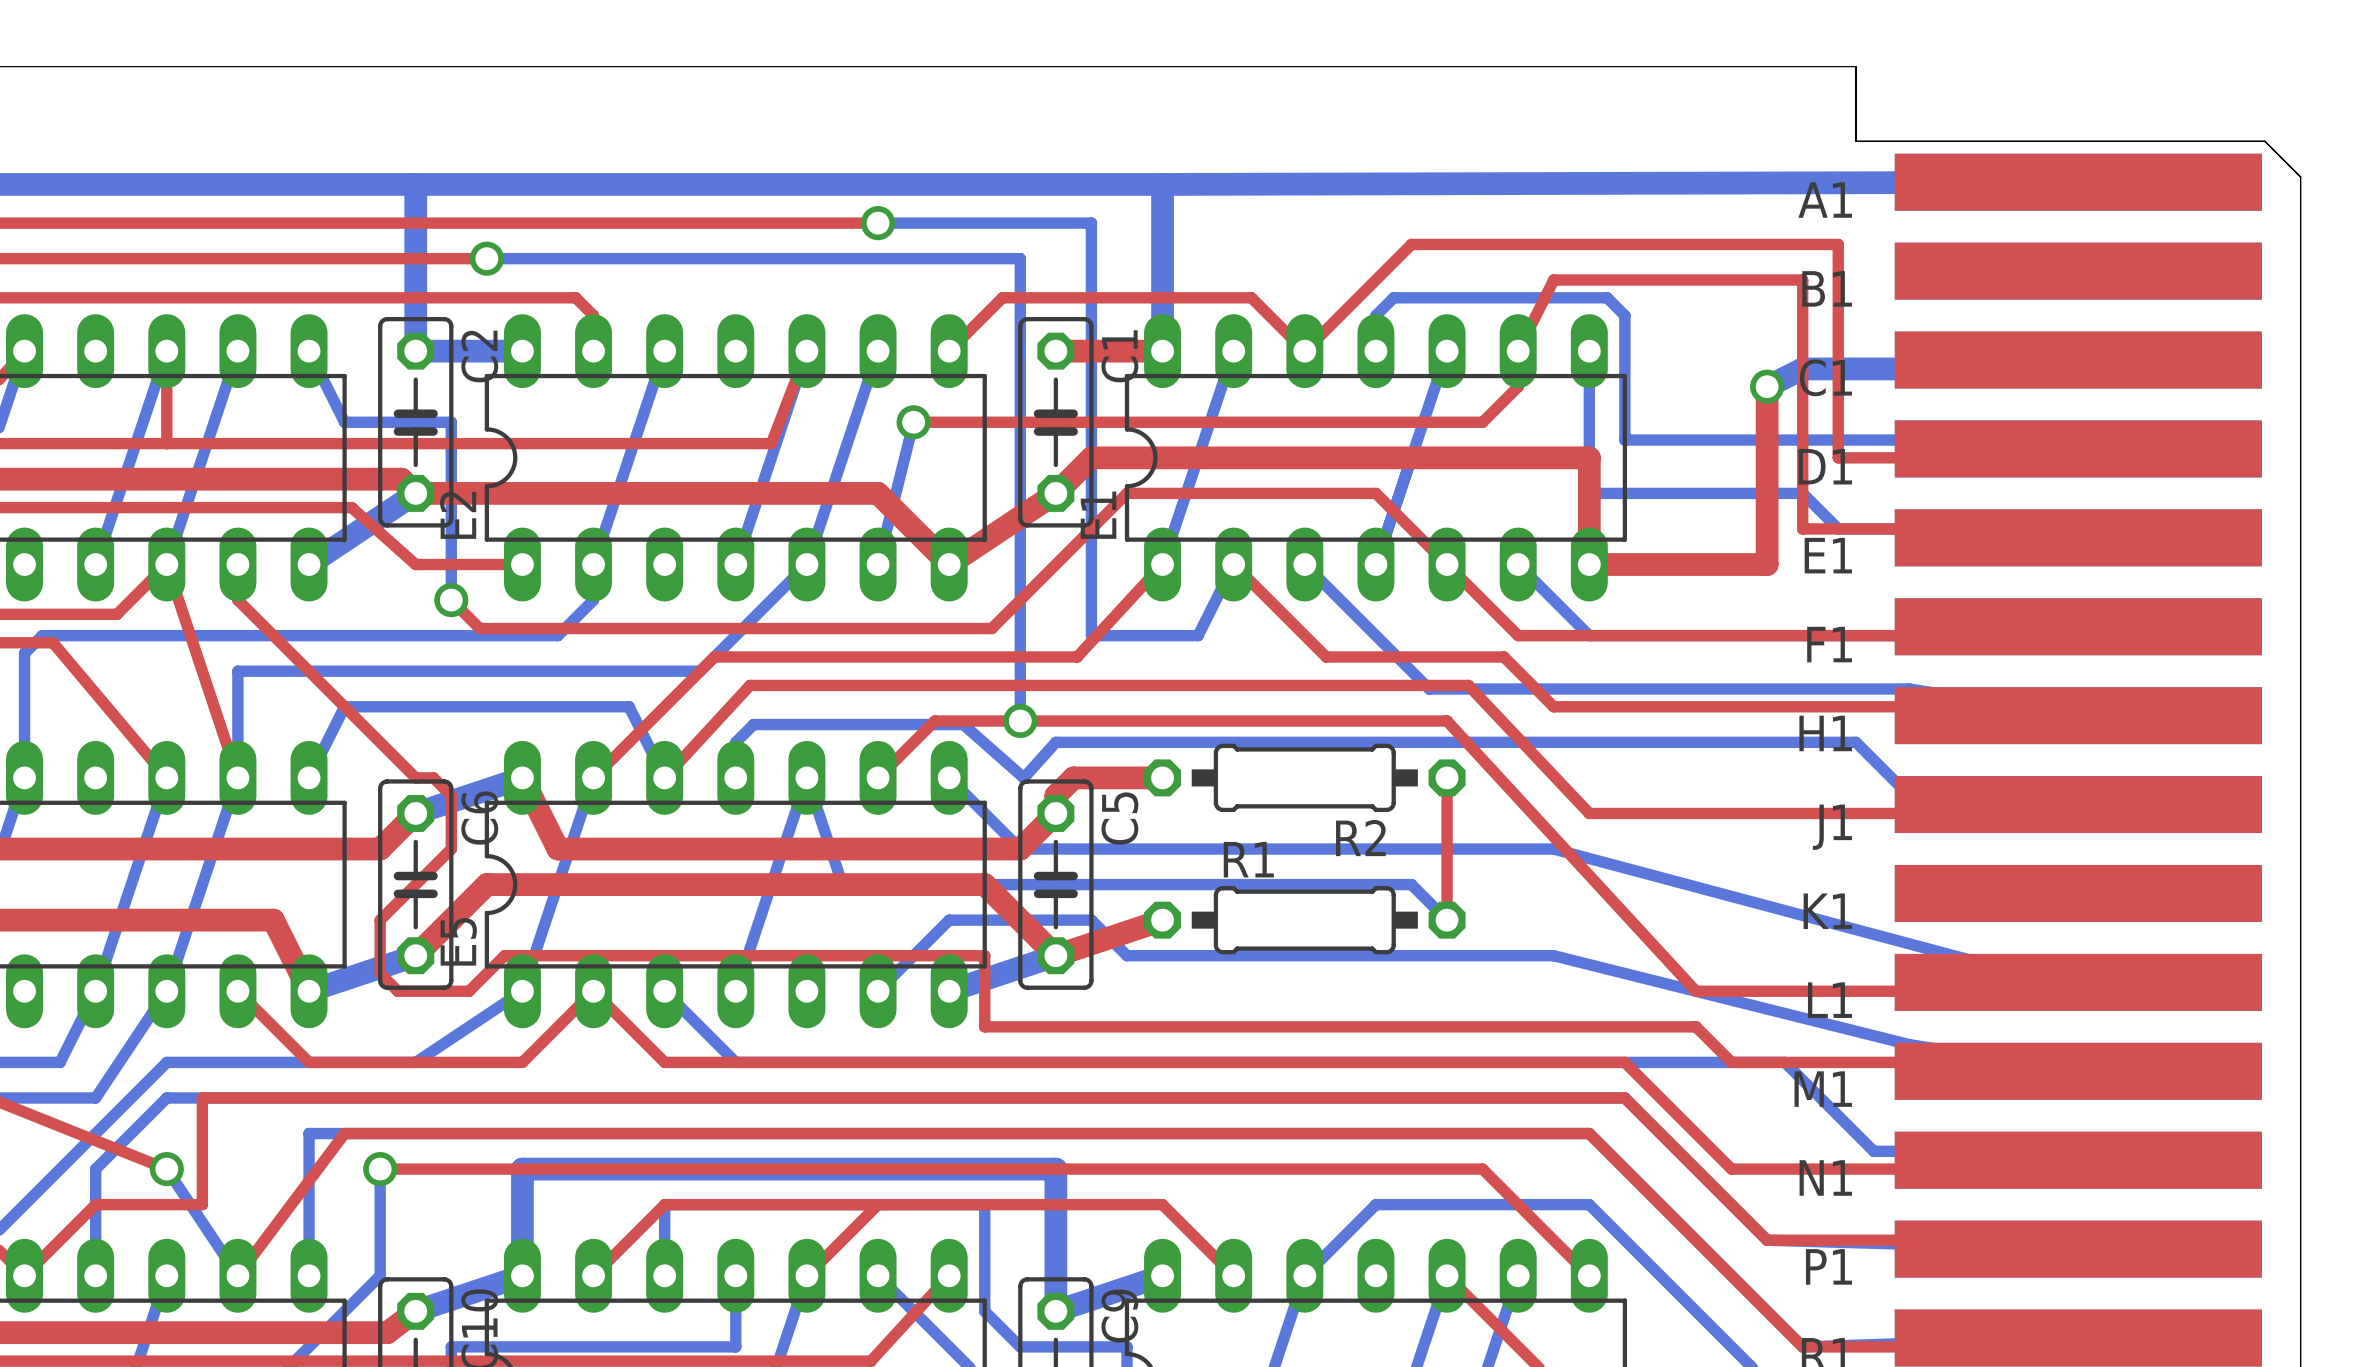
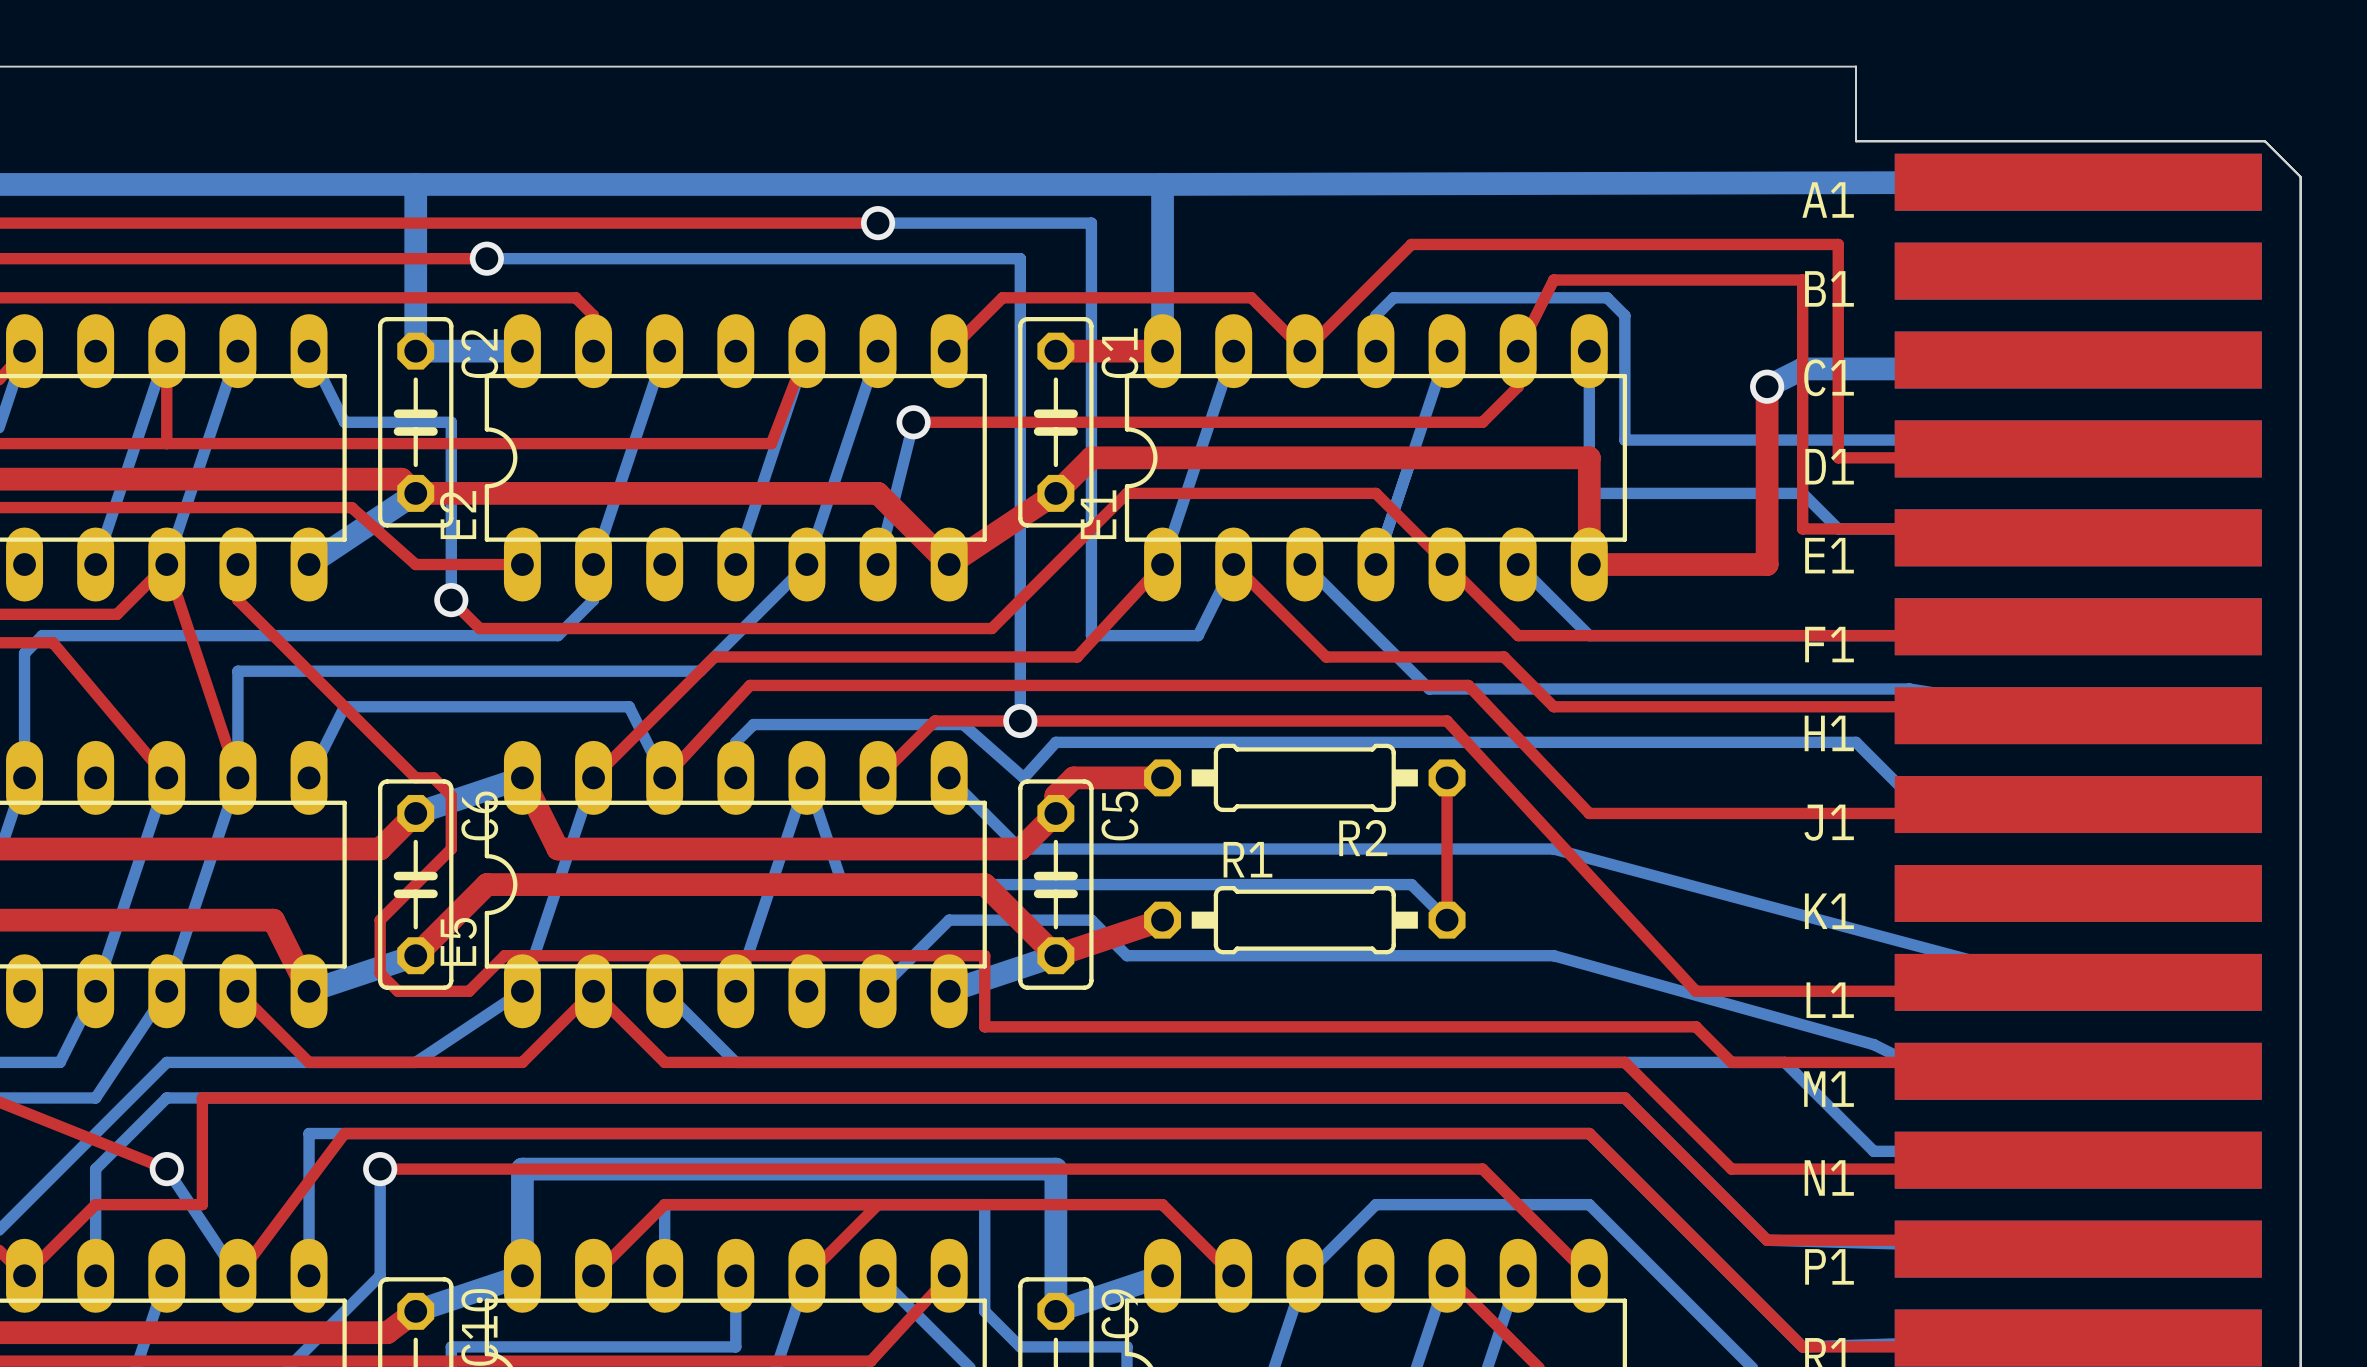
bottom track: (1553, 955) (1909, 1044) (2078, 1071) -> (1553, 955) (1873, 1044) (1909, 1062) (2078, 1071)

